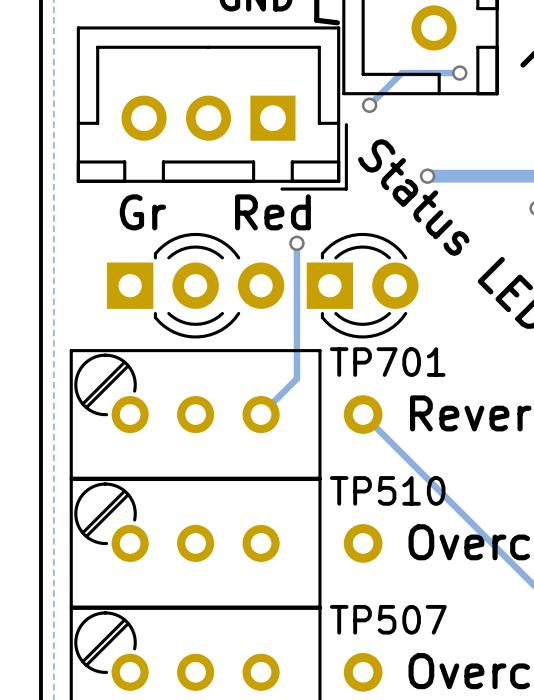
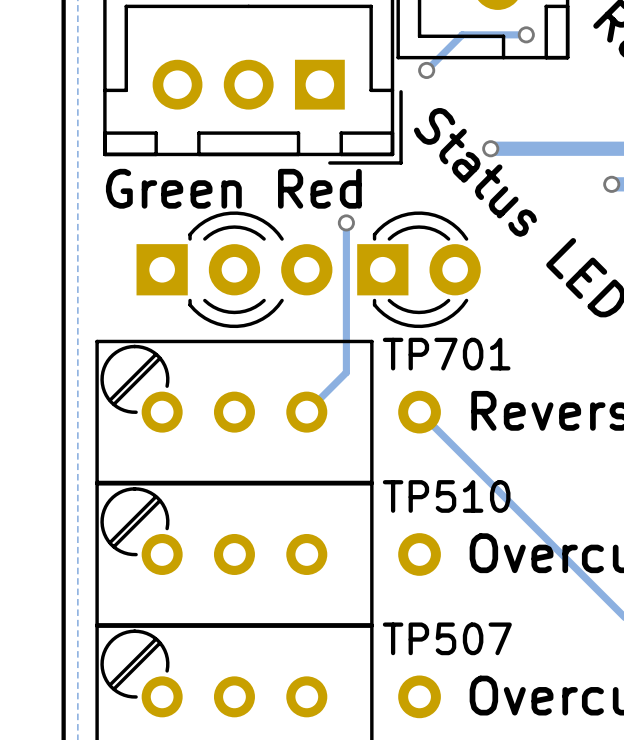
text: Gr (142, 212) -> Green (173, 188)

